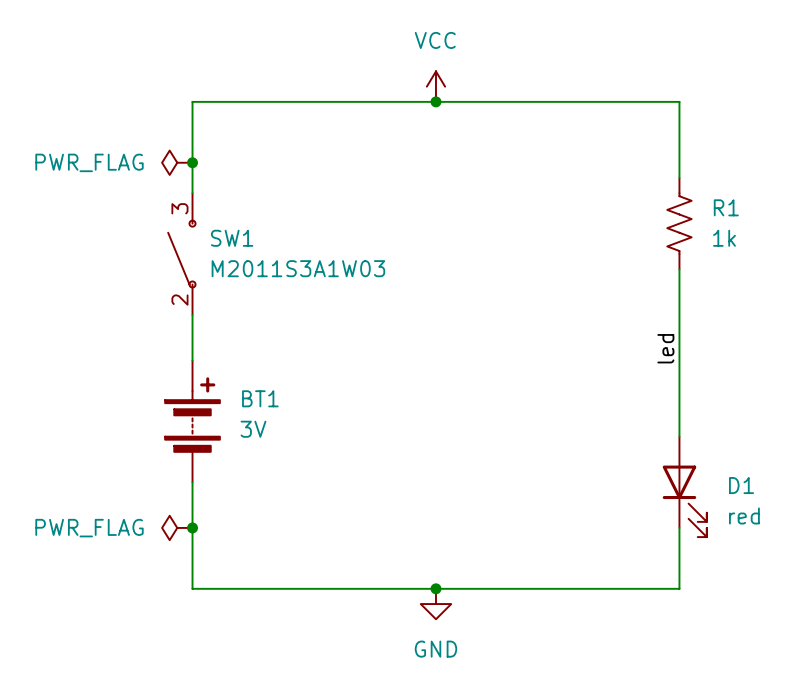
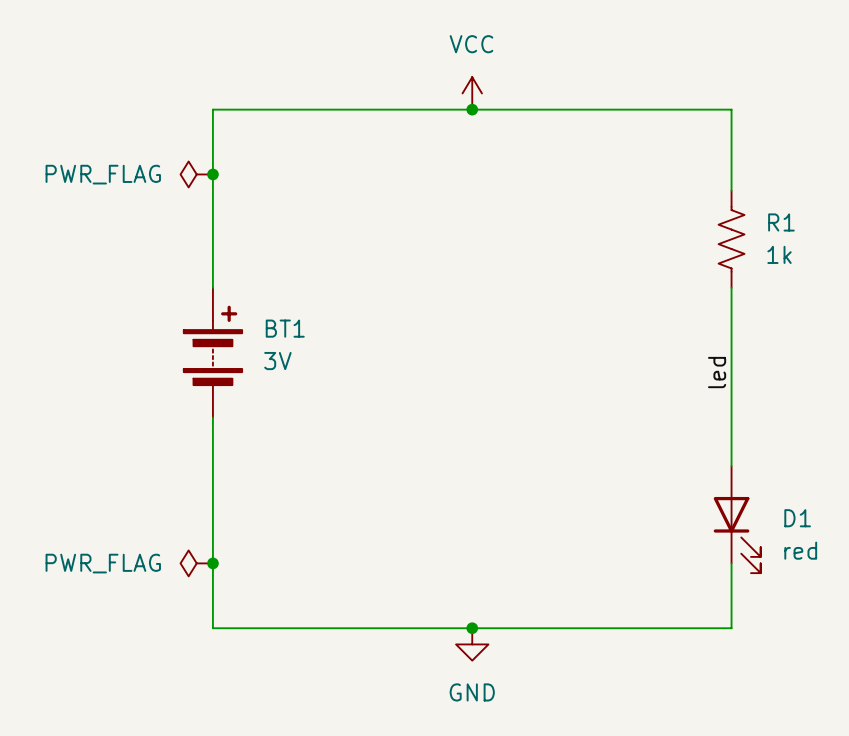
wire: none -> (212, 206) (212, 287)
SW1: M2011S3A1W03 (181, 254) -> none
BT1 position: (192, 421) -> (212, 352)

